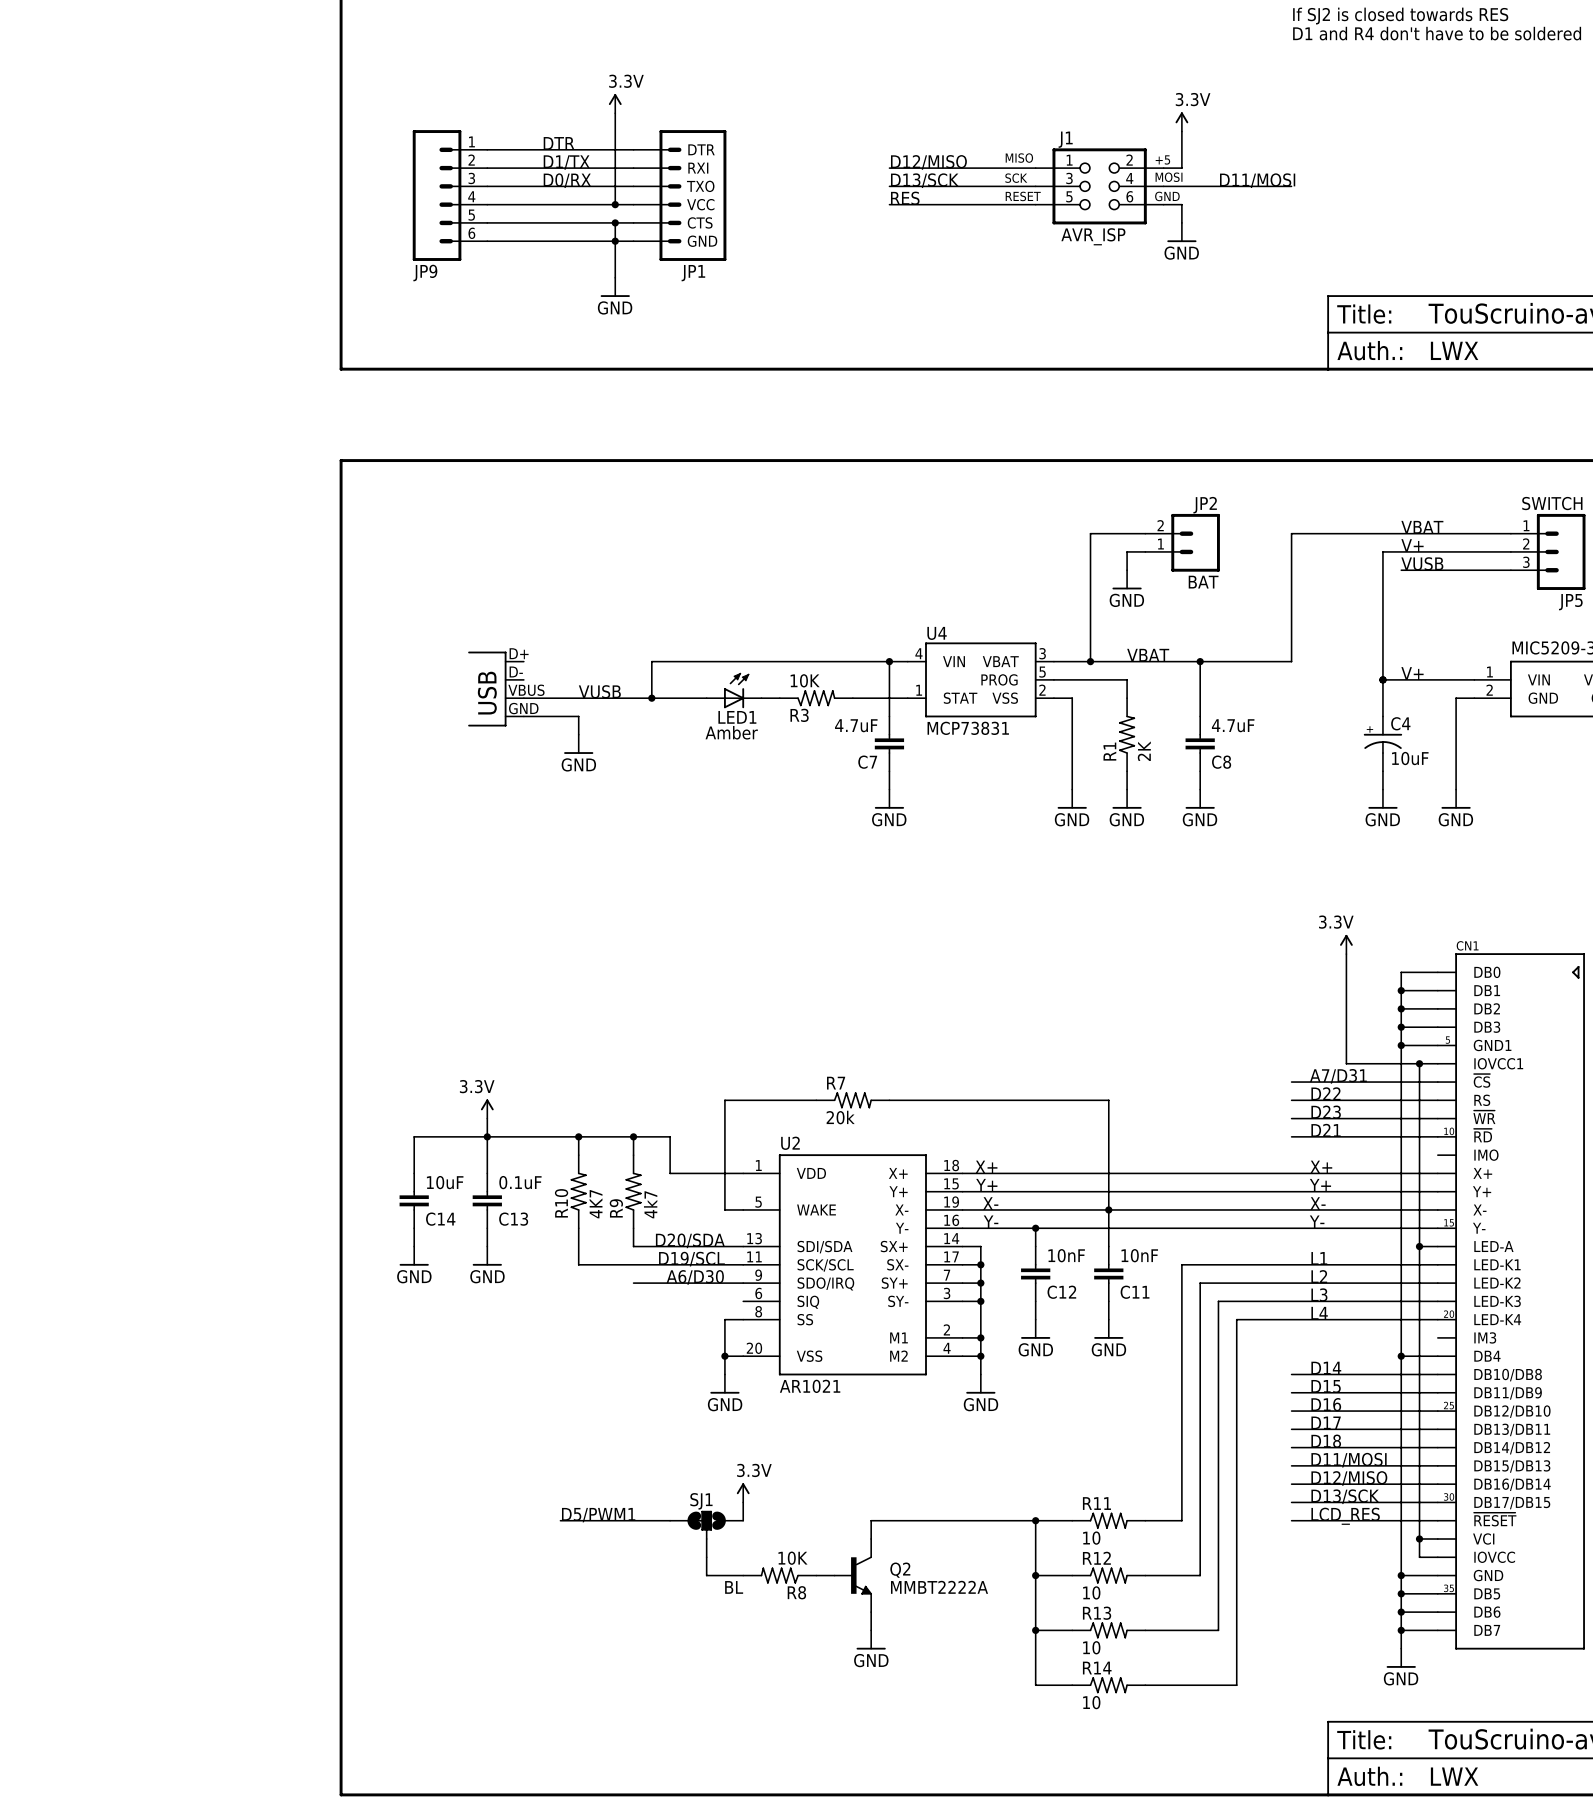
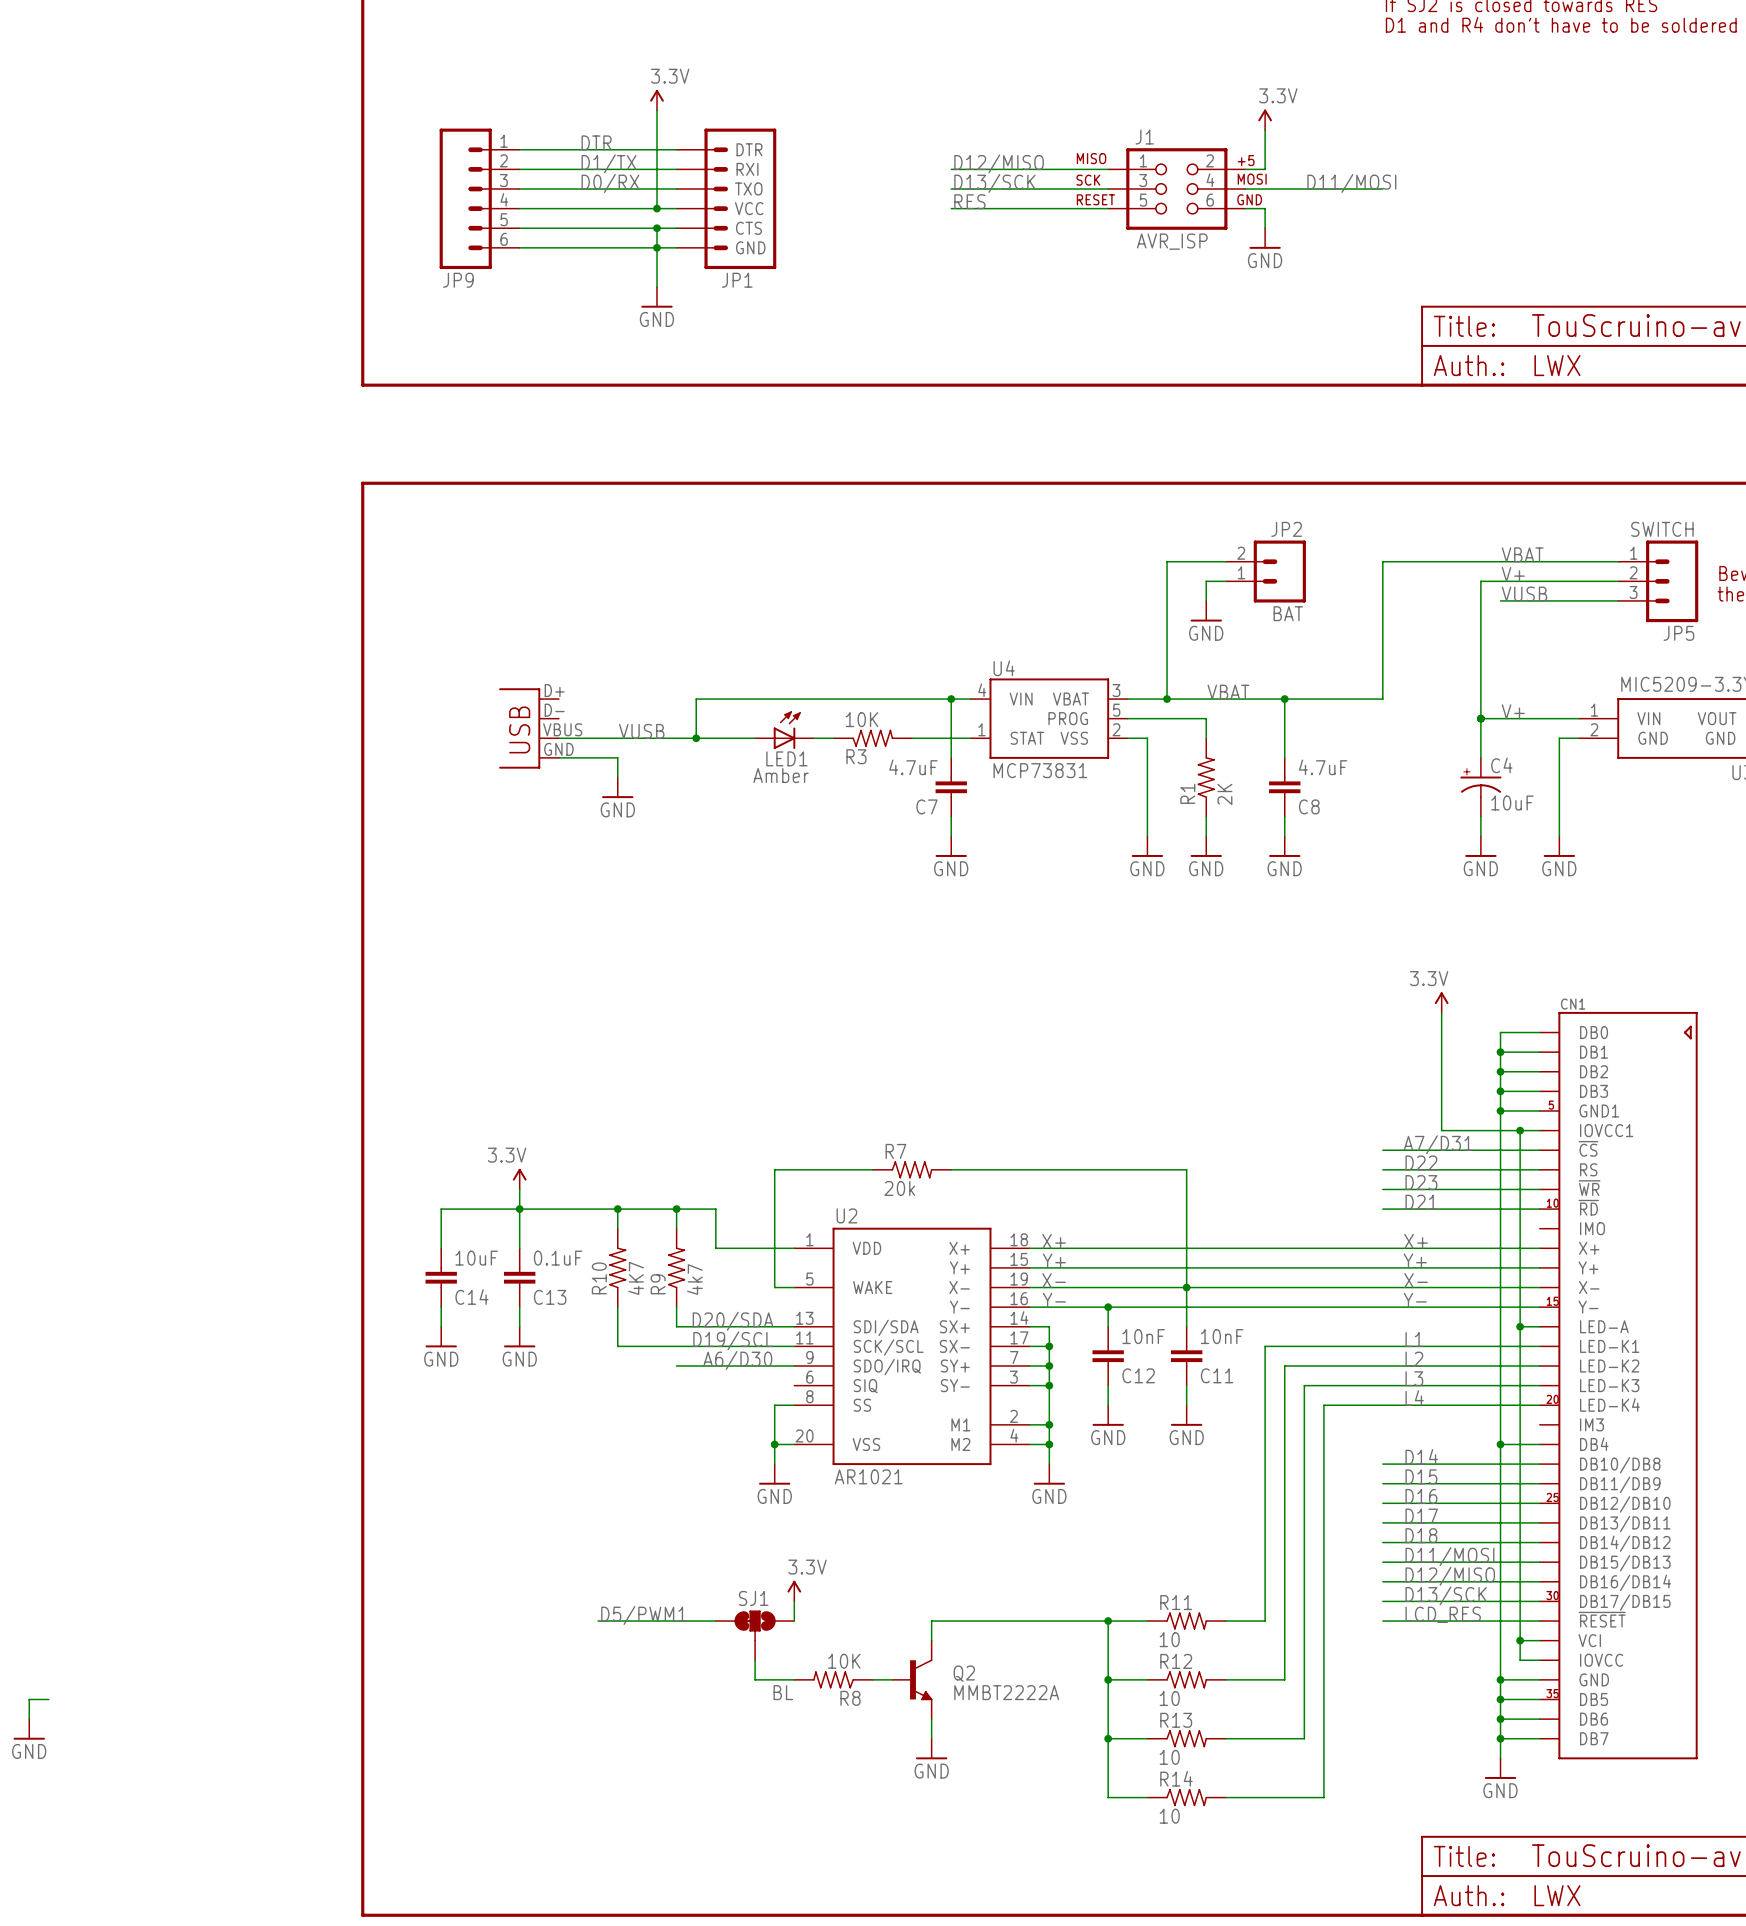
wire: none -> (48, 1699) (29, 1699) (29, 1719)
power symbol: none -> GND (29, 1729)

